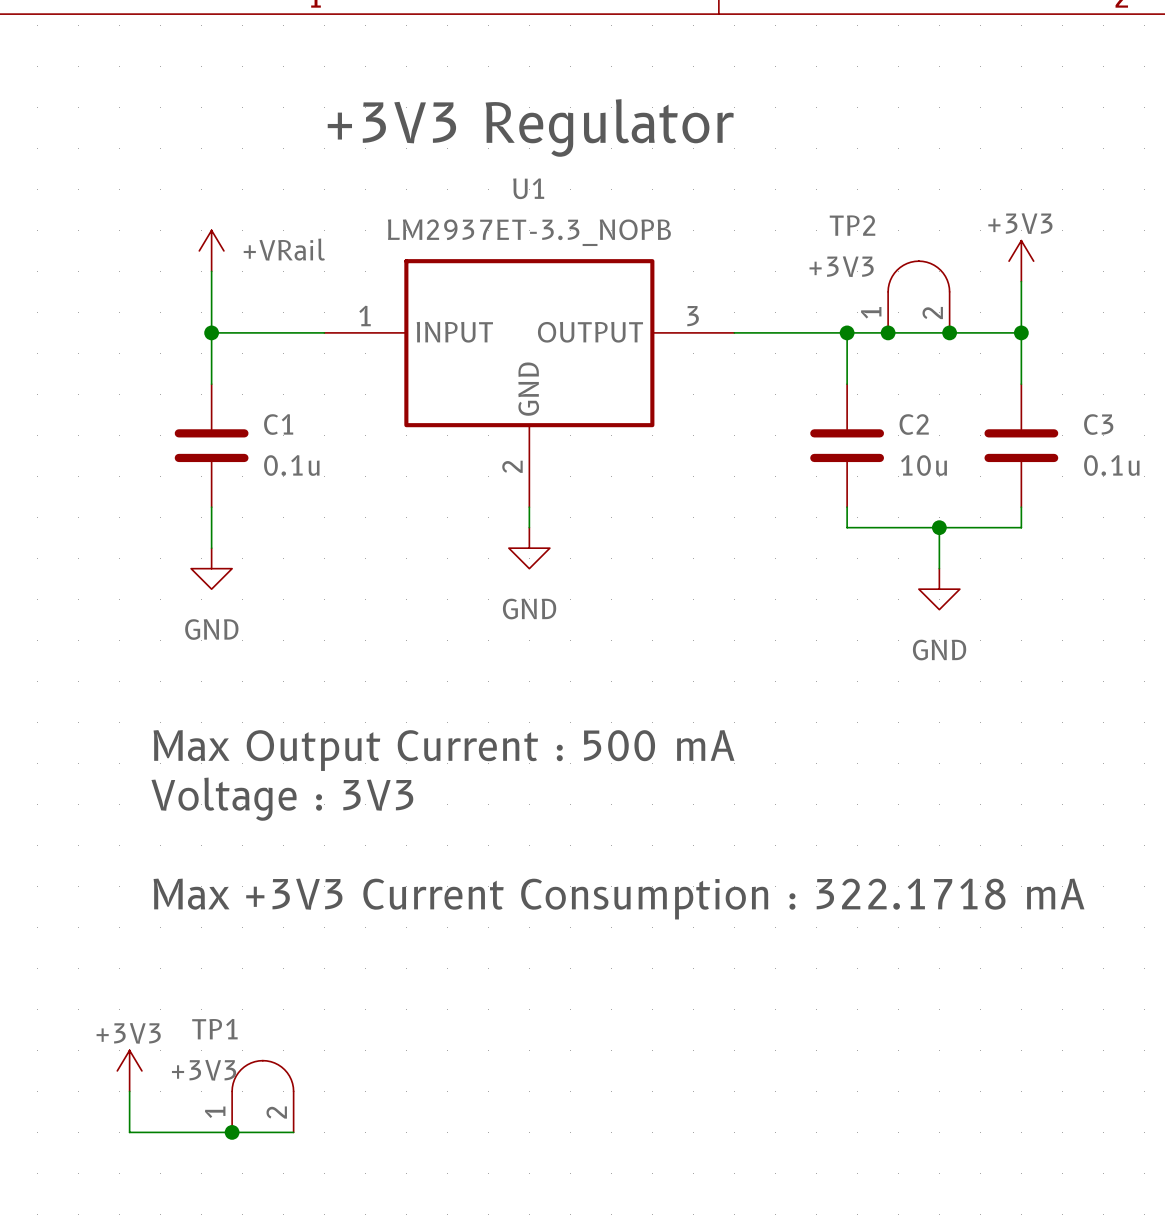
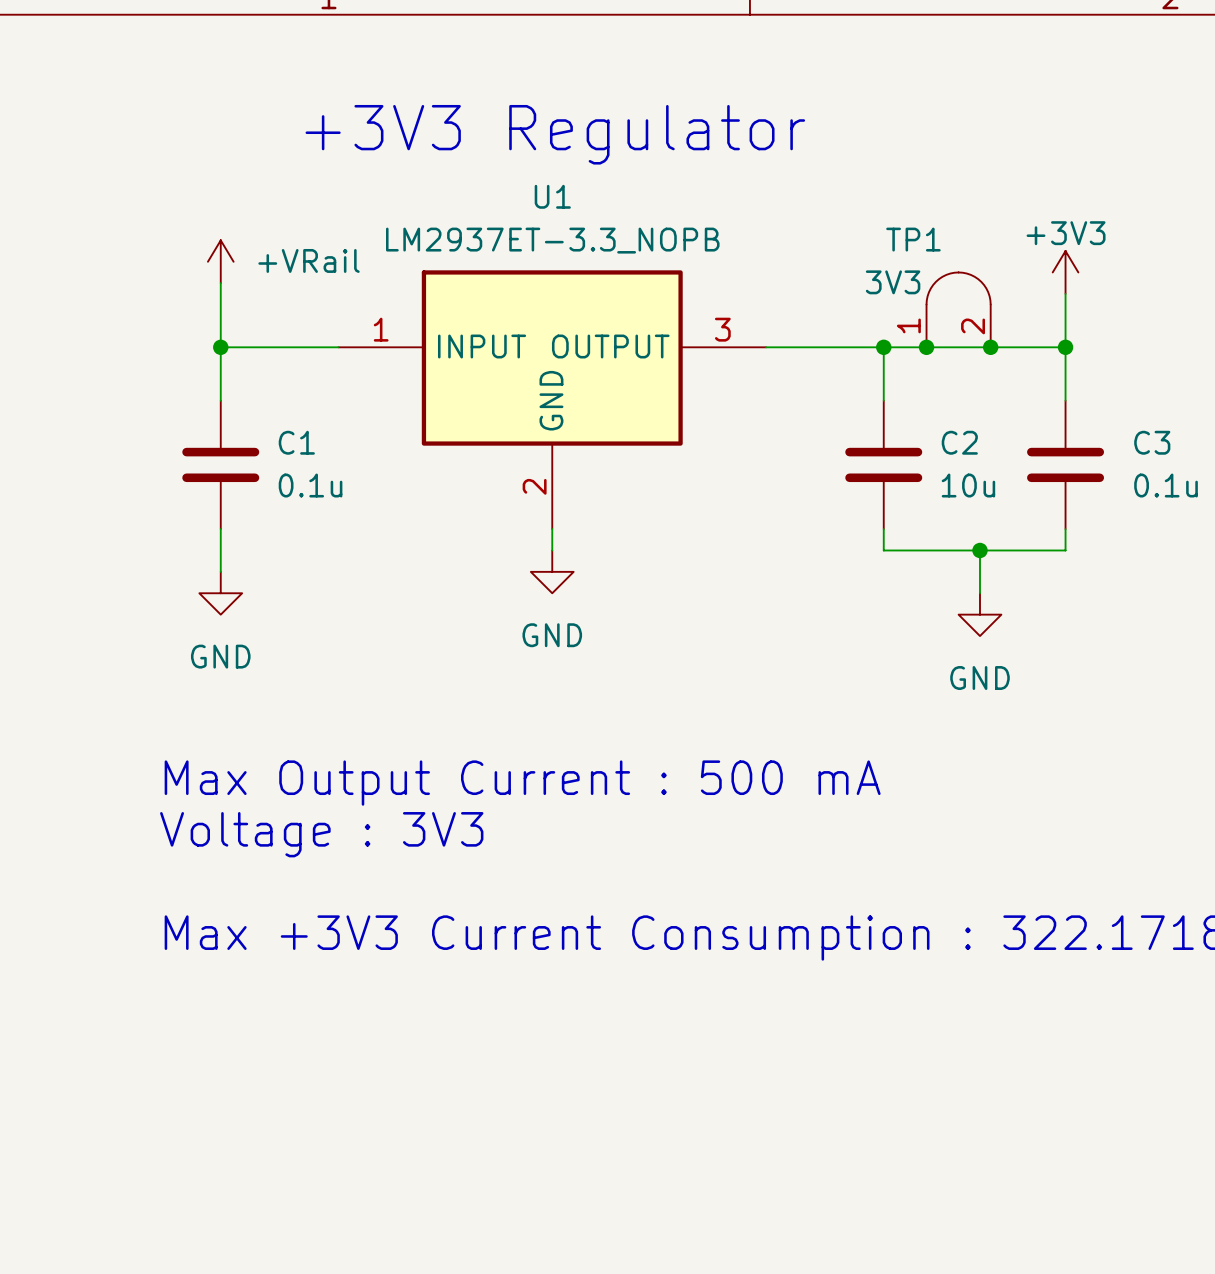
TP2 name: TP2 (852, 225) -> TP1 (913, 239)
TP2 value: +3V3 (841, 266) -> 3V3 (893, 282)
power symbol: +3V3 (129, 1070) -> none
wire: (129, 1091) (129, 1132) (293, 1132) -> none
TP1: +3V3 (262, 1096) -> none
junction: (232, 1132) -> none

